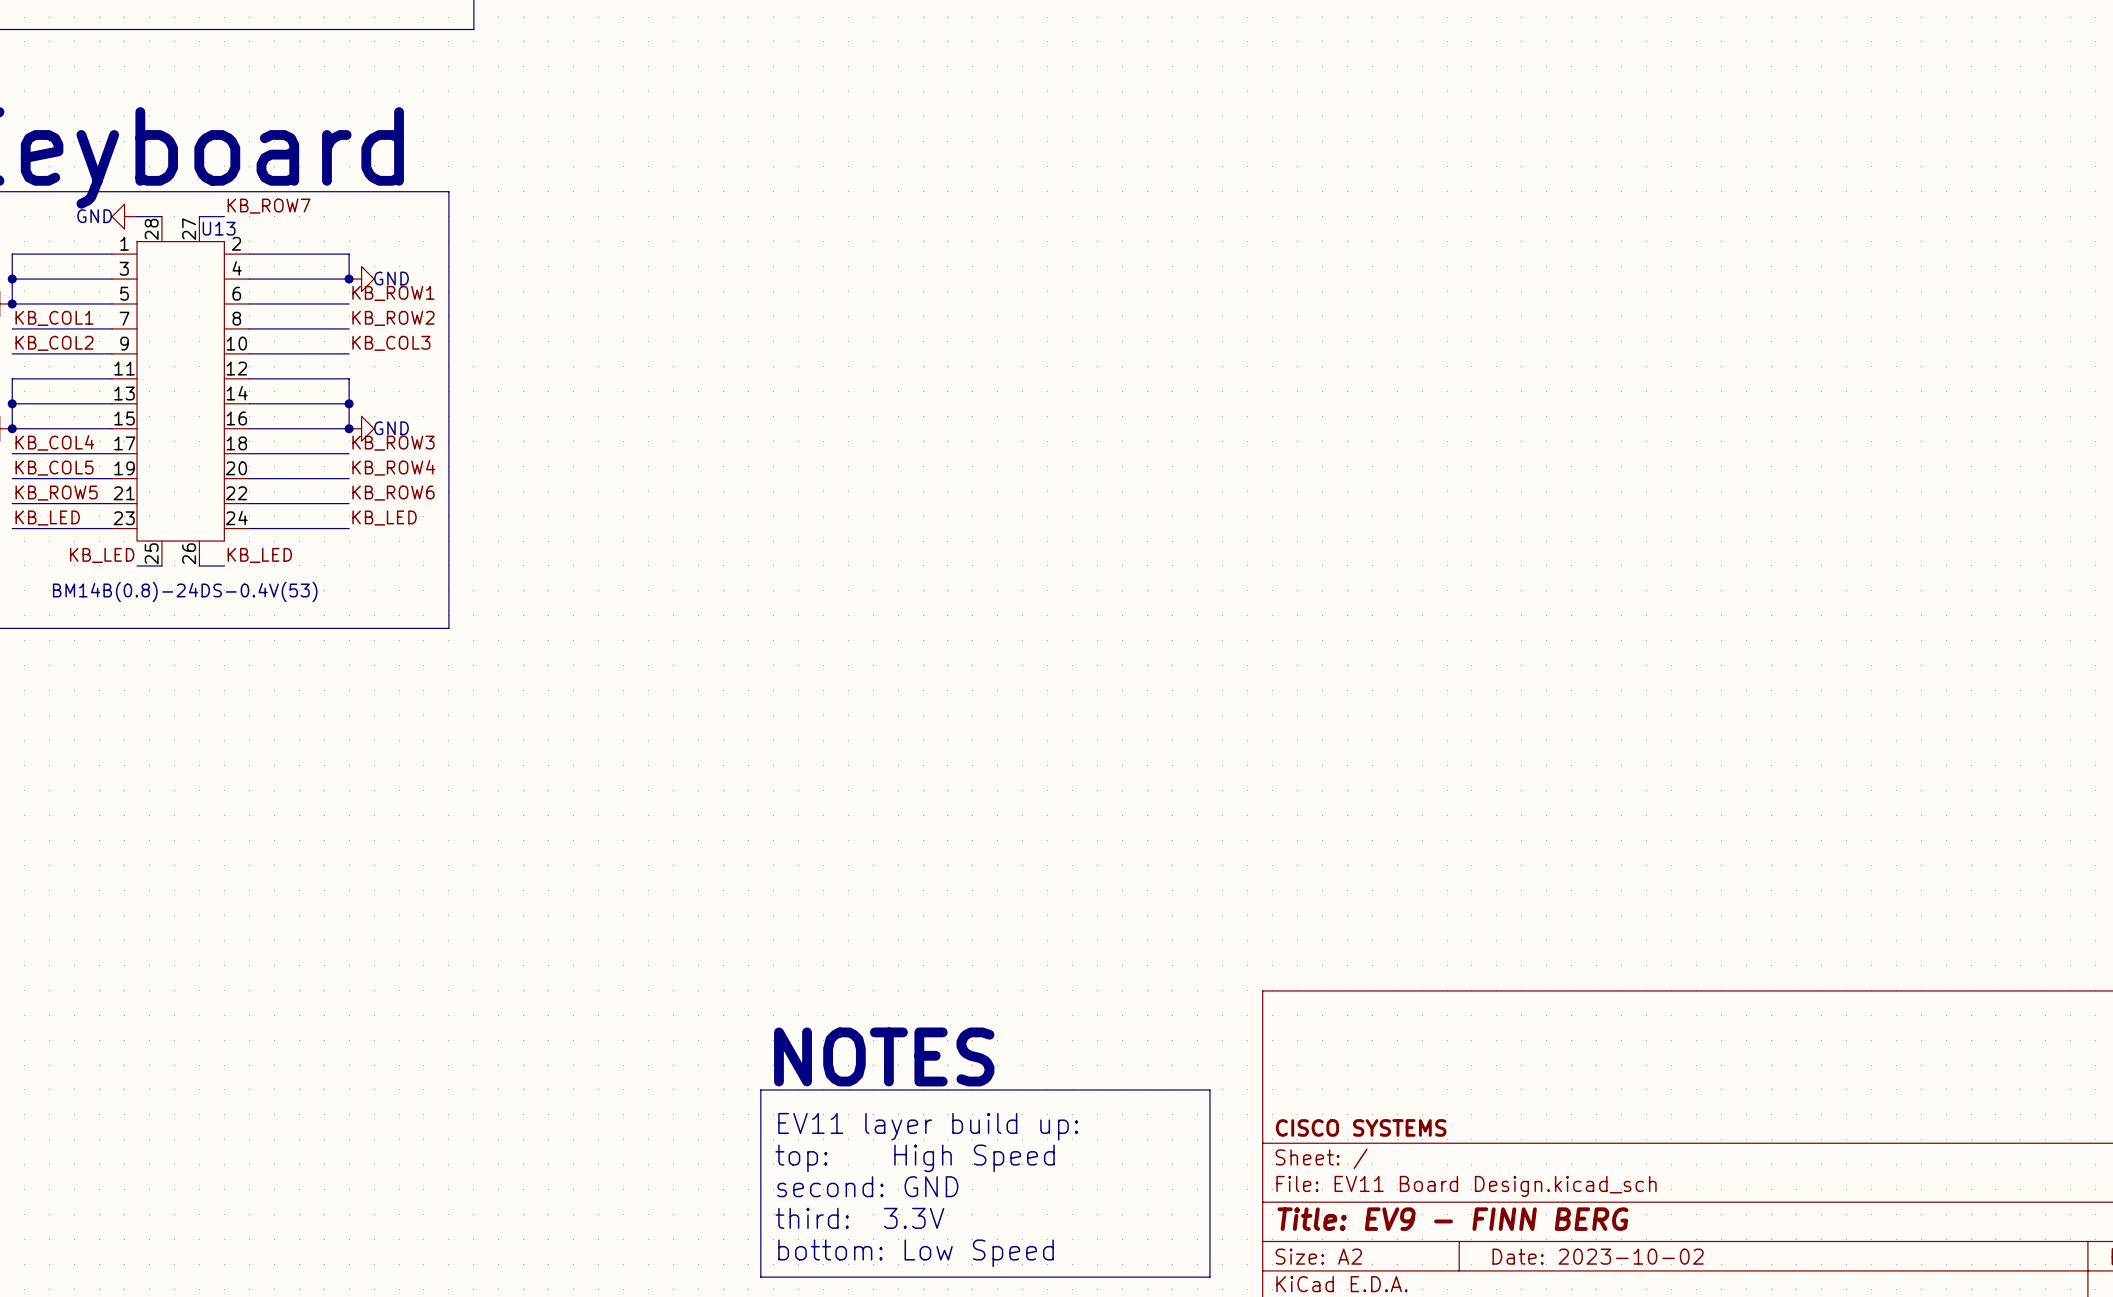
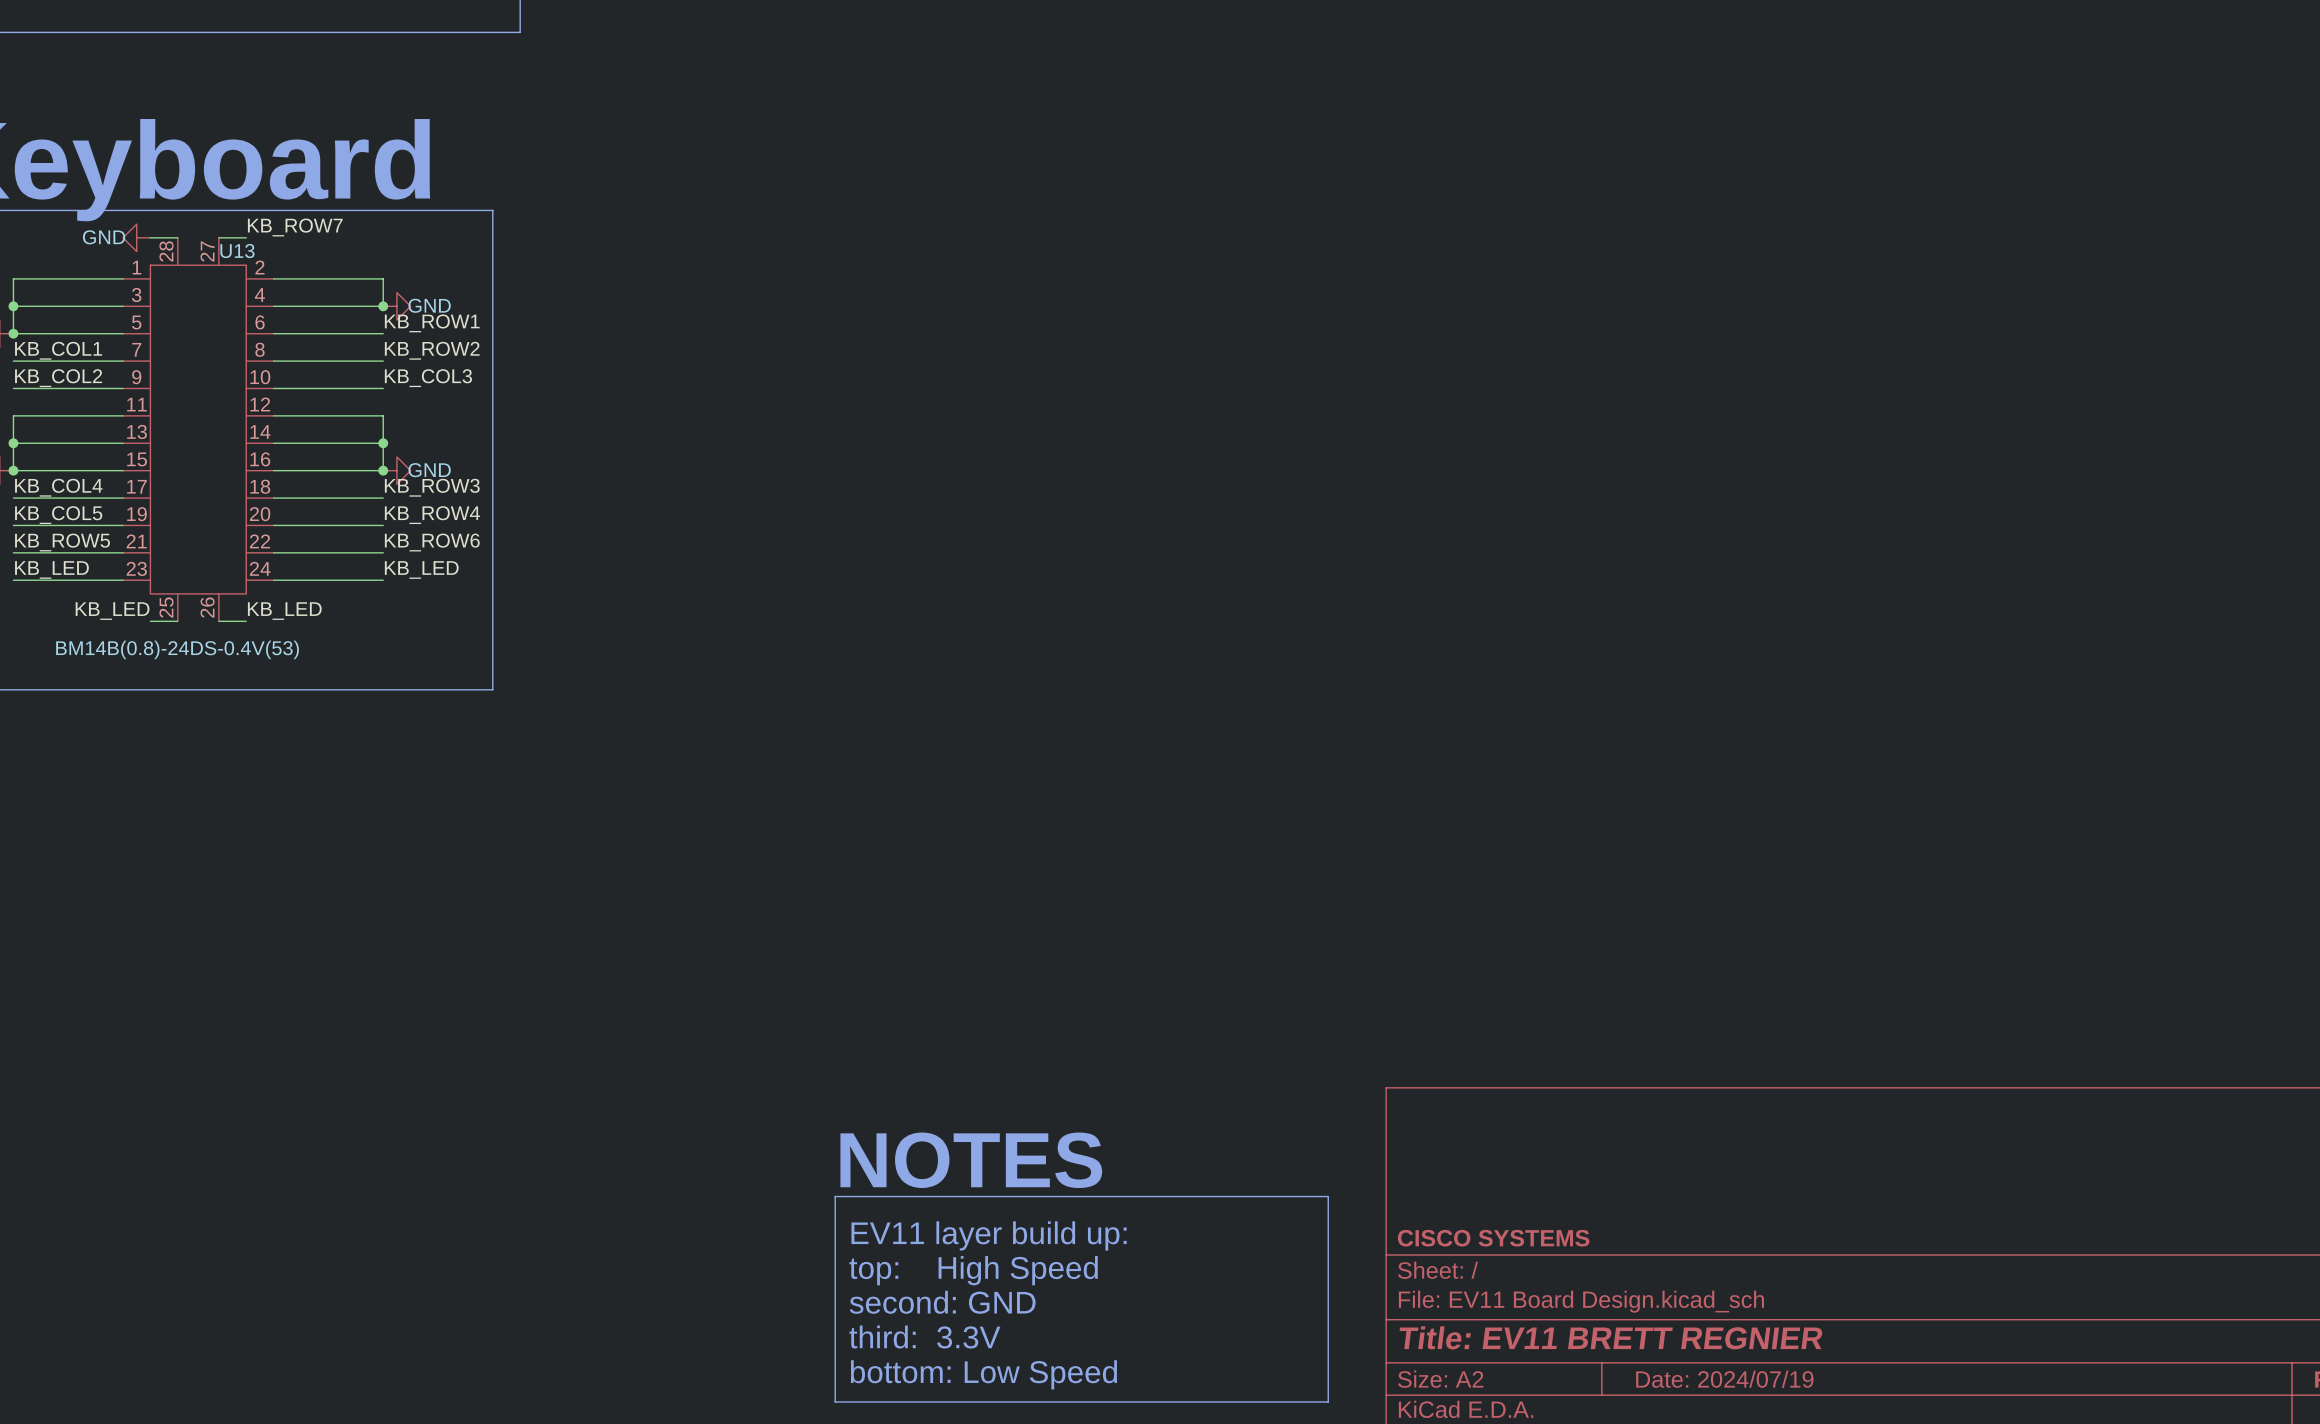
title block: Title: EV9 - FINN BERG (1452, 1219) -> Title: EV11 BRETT REGNIER (1611, 1337)
title block: Date: 2023-10-02 (1598, 1256) -> Date: 2024/07/19 (1724, 1379)

